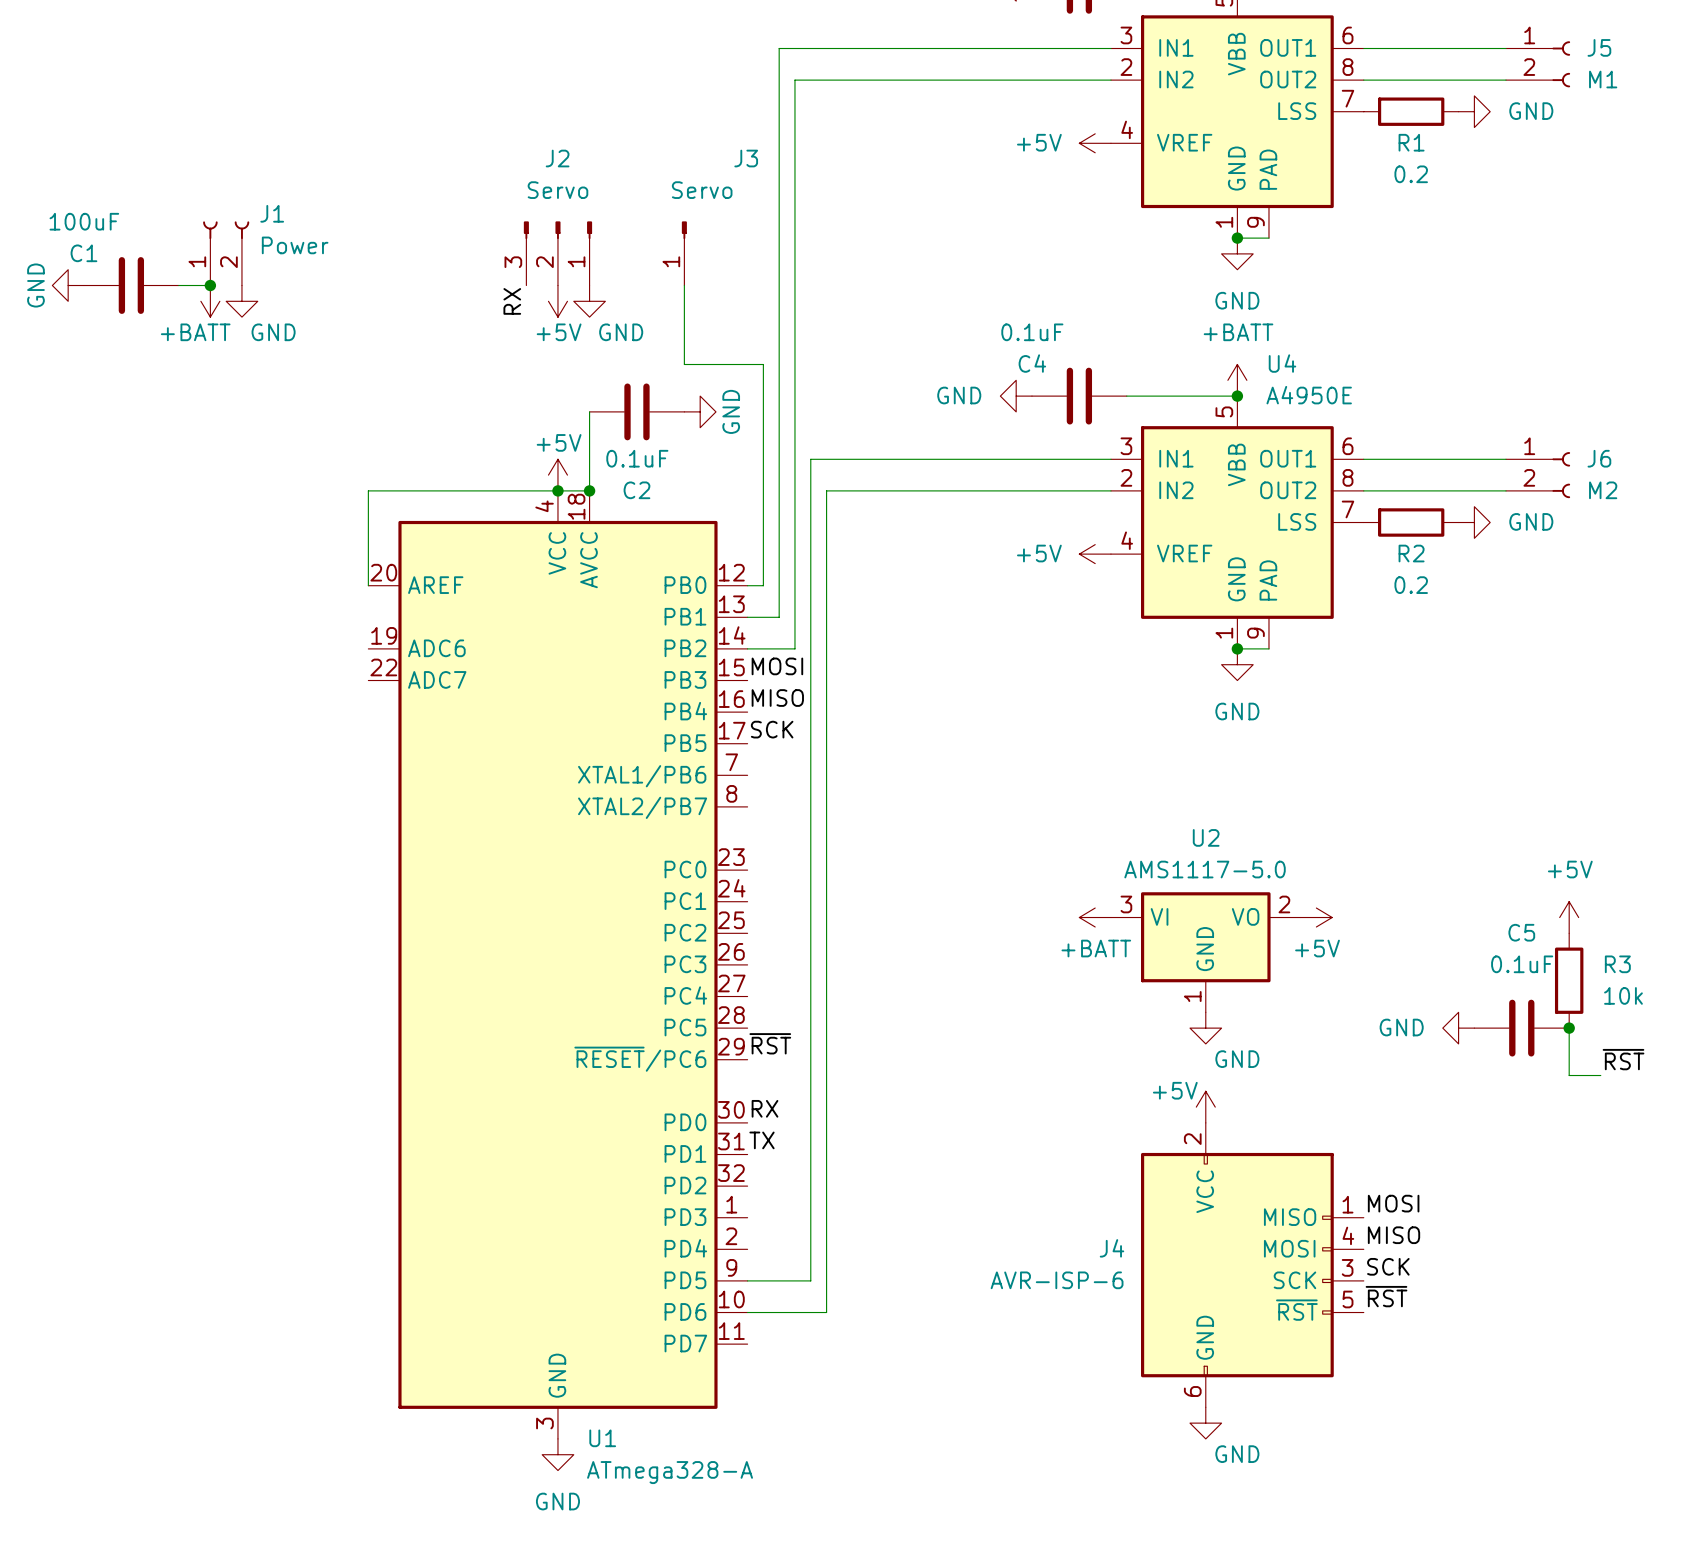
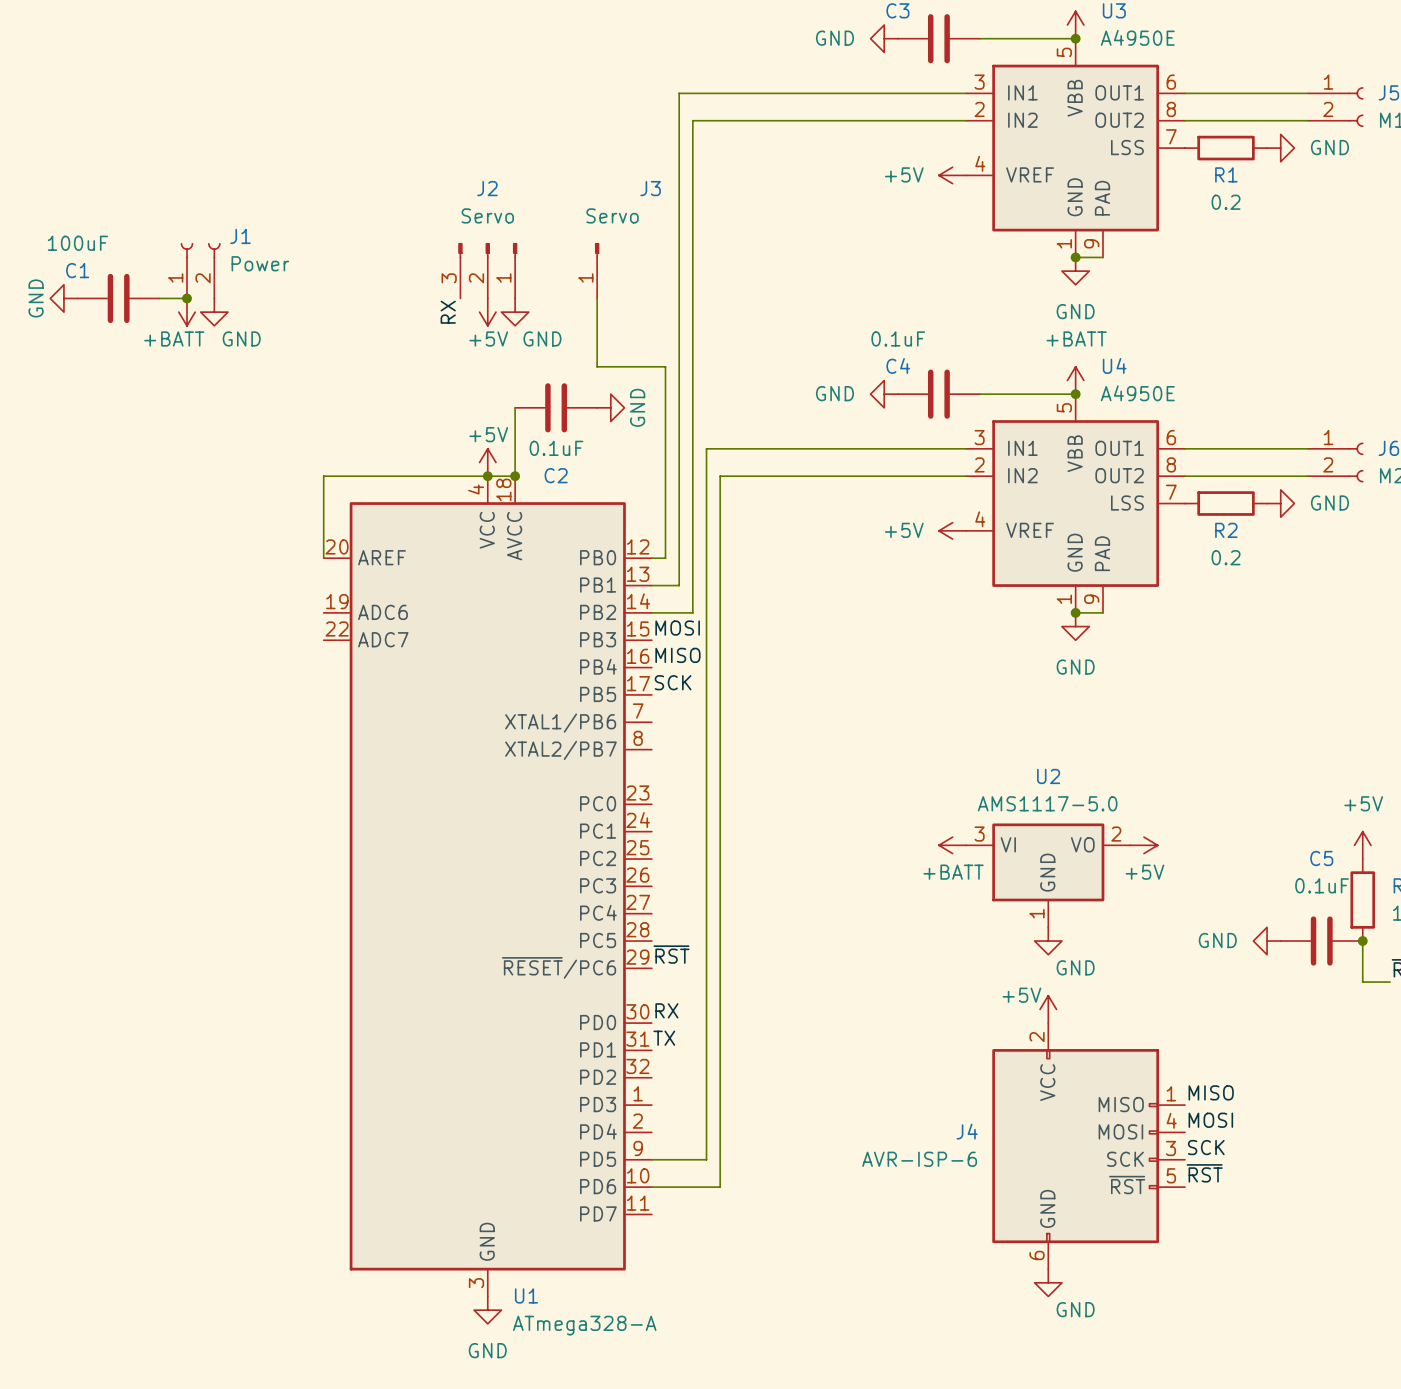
label: MOSI (1393, 1203) -> MISO (1211, 1092)
label: MISO (1394, 1235) -> MOSI (1210, 1120)

